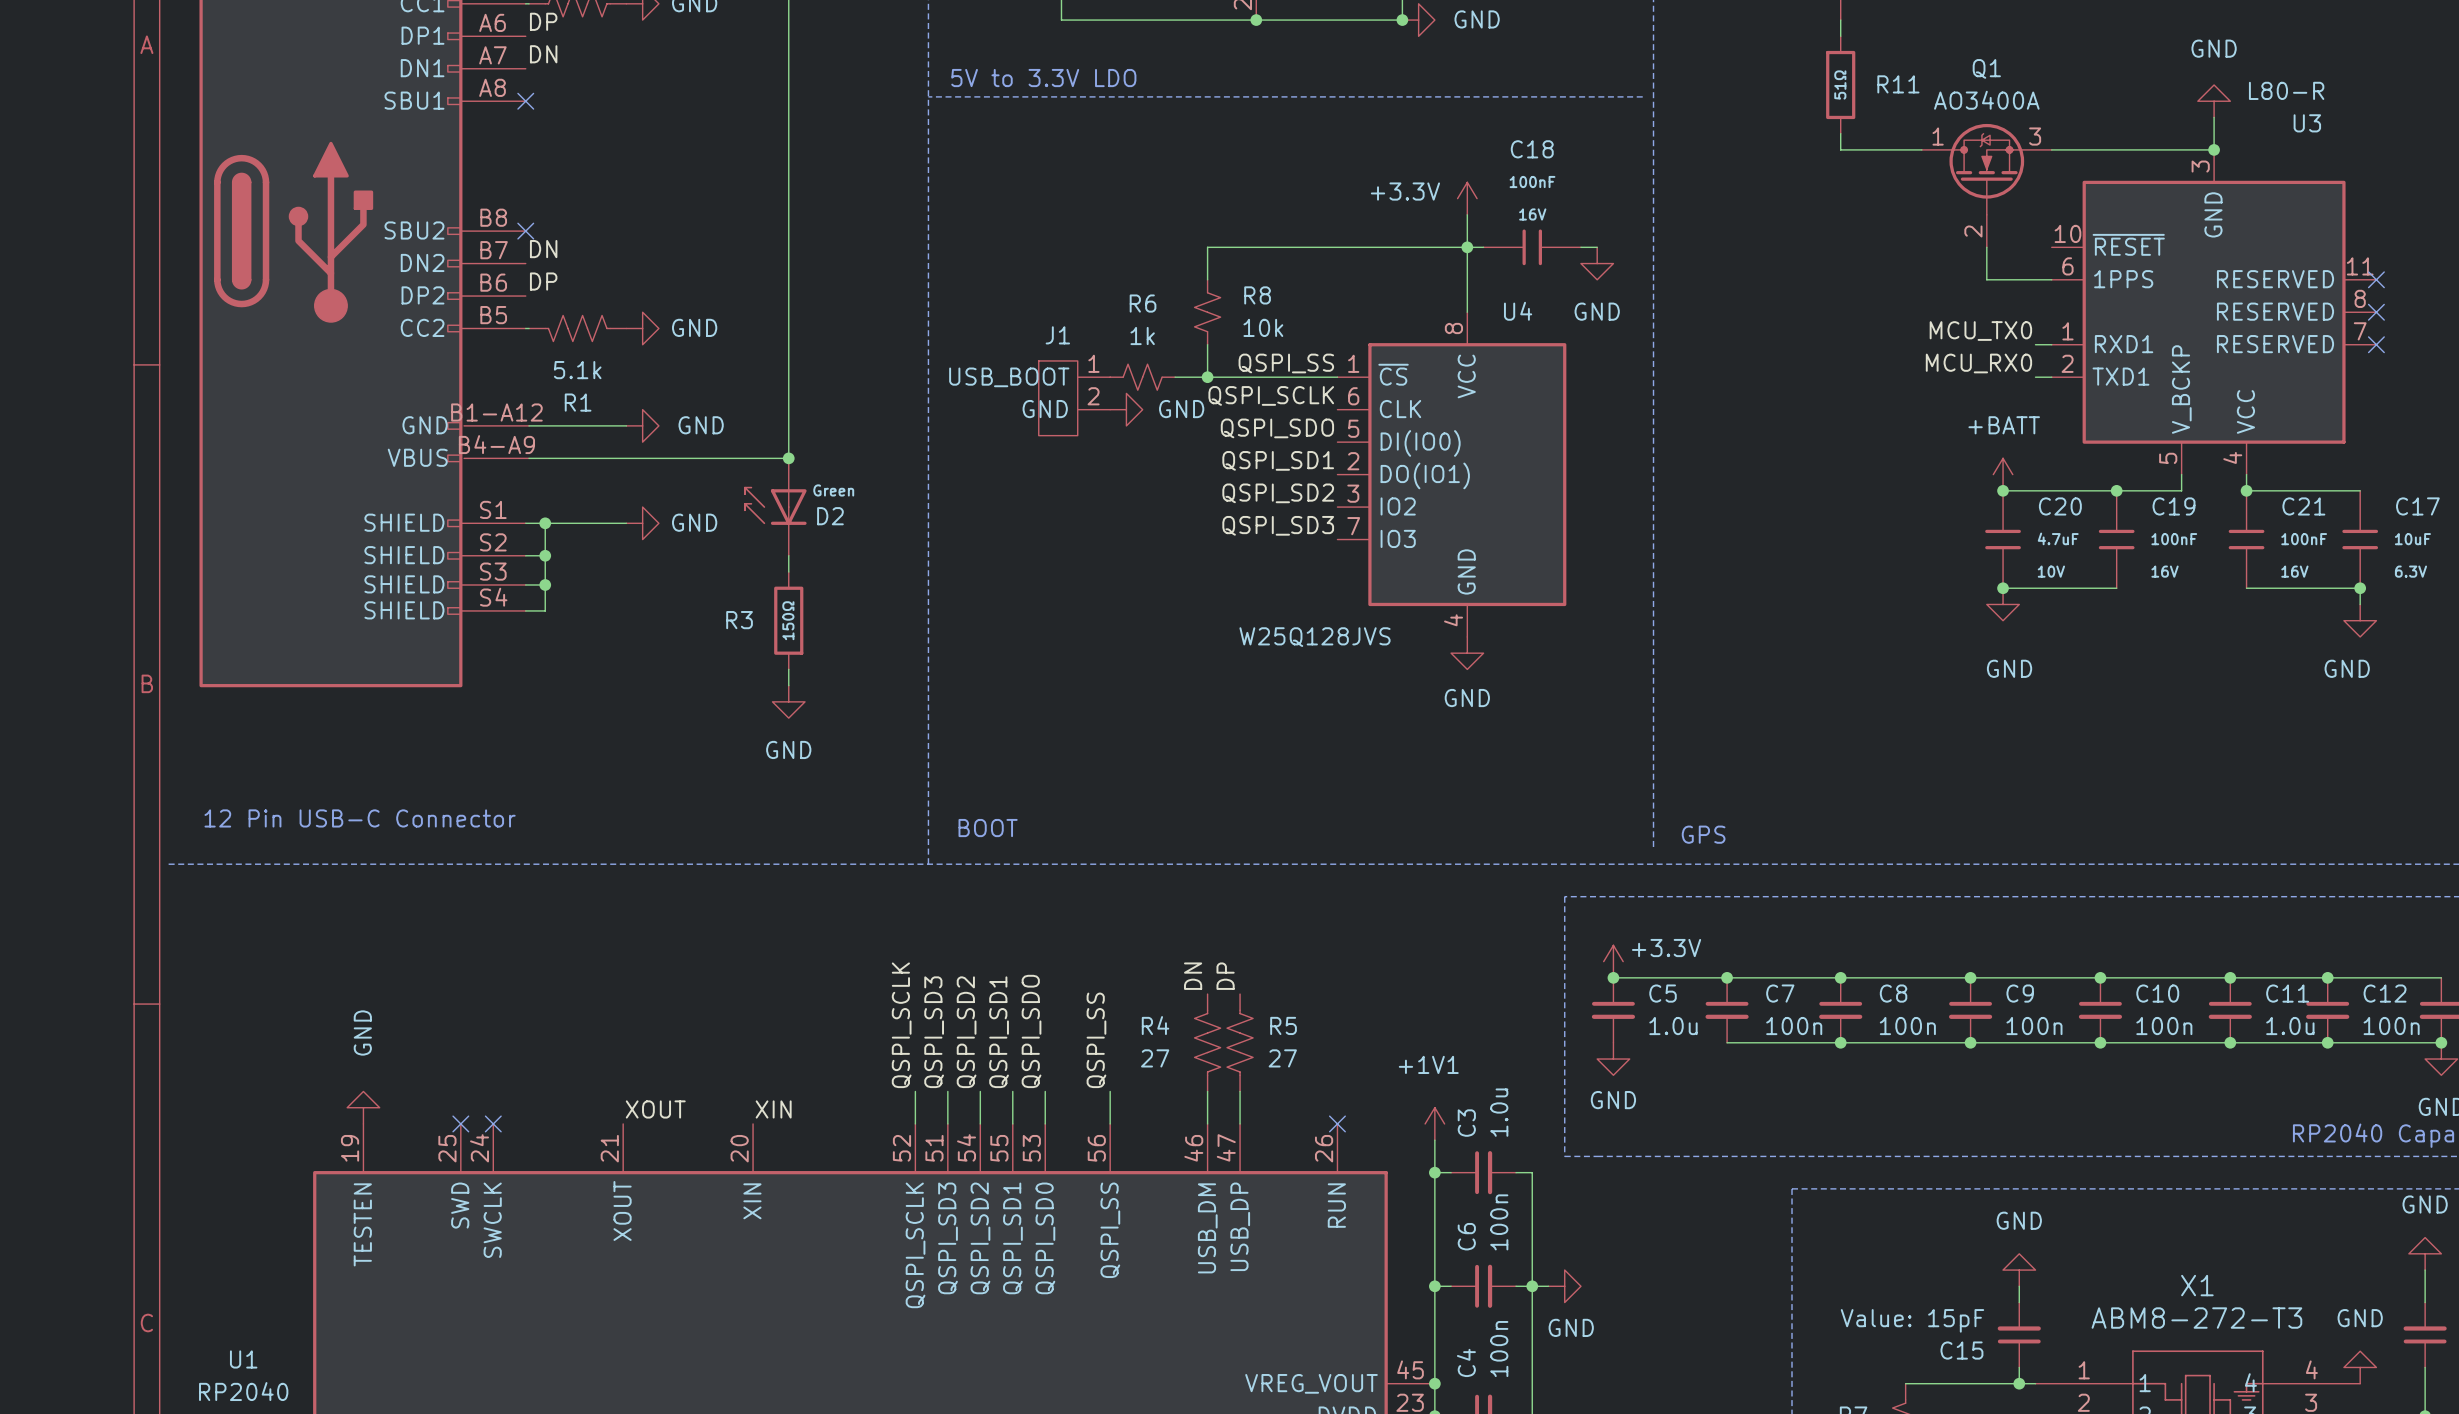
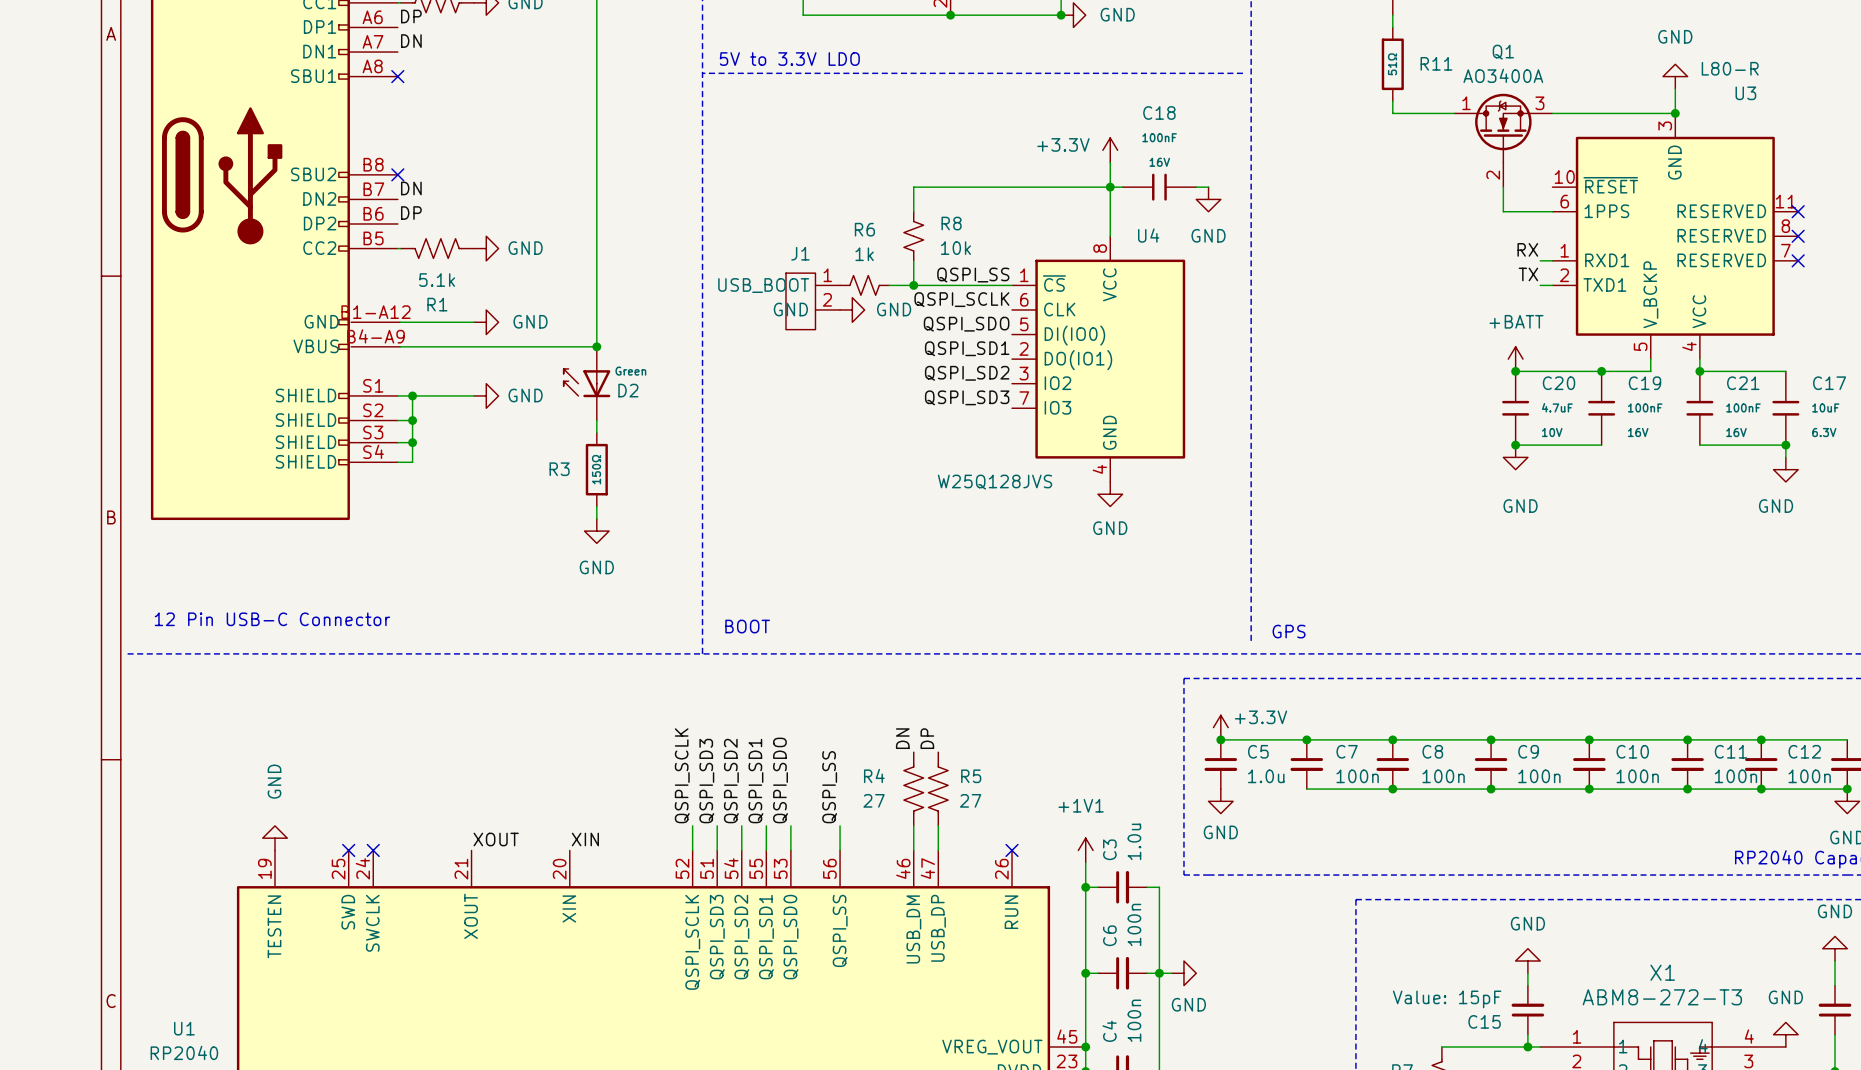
label: MCU_TX0 (1980, 331) -> RX (1527, 249)
label: MCU_RX0 (1978, 363) -> TX (1528, 274)
C11 value: 1.0u (2290, 1026) -> 100n (1735, 776)

